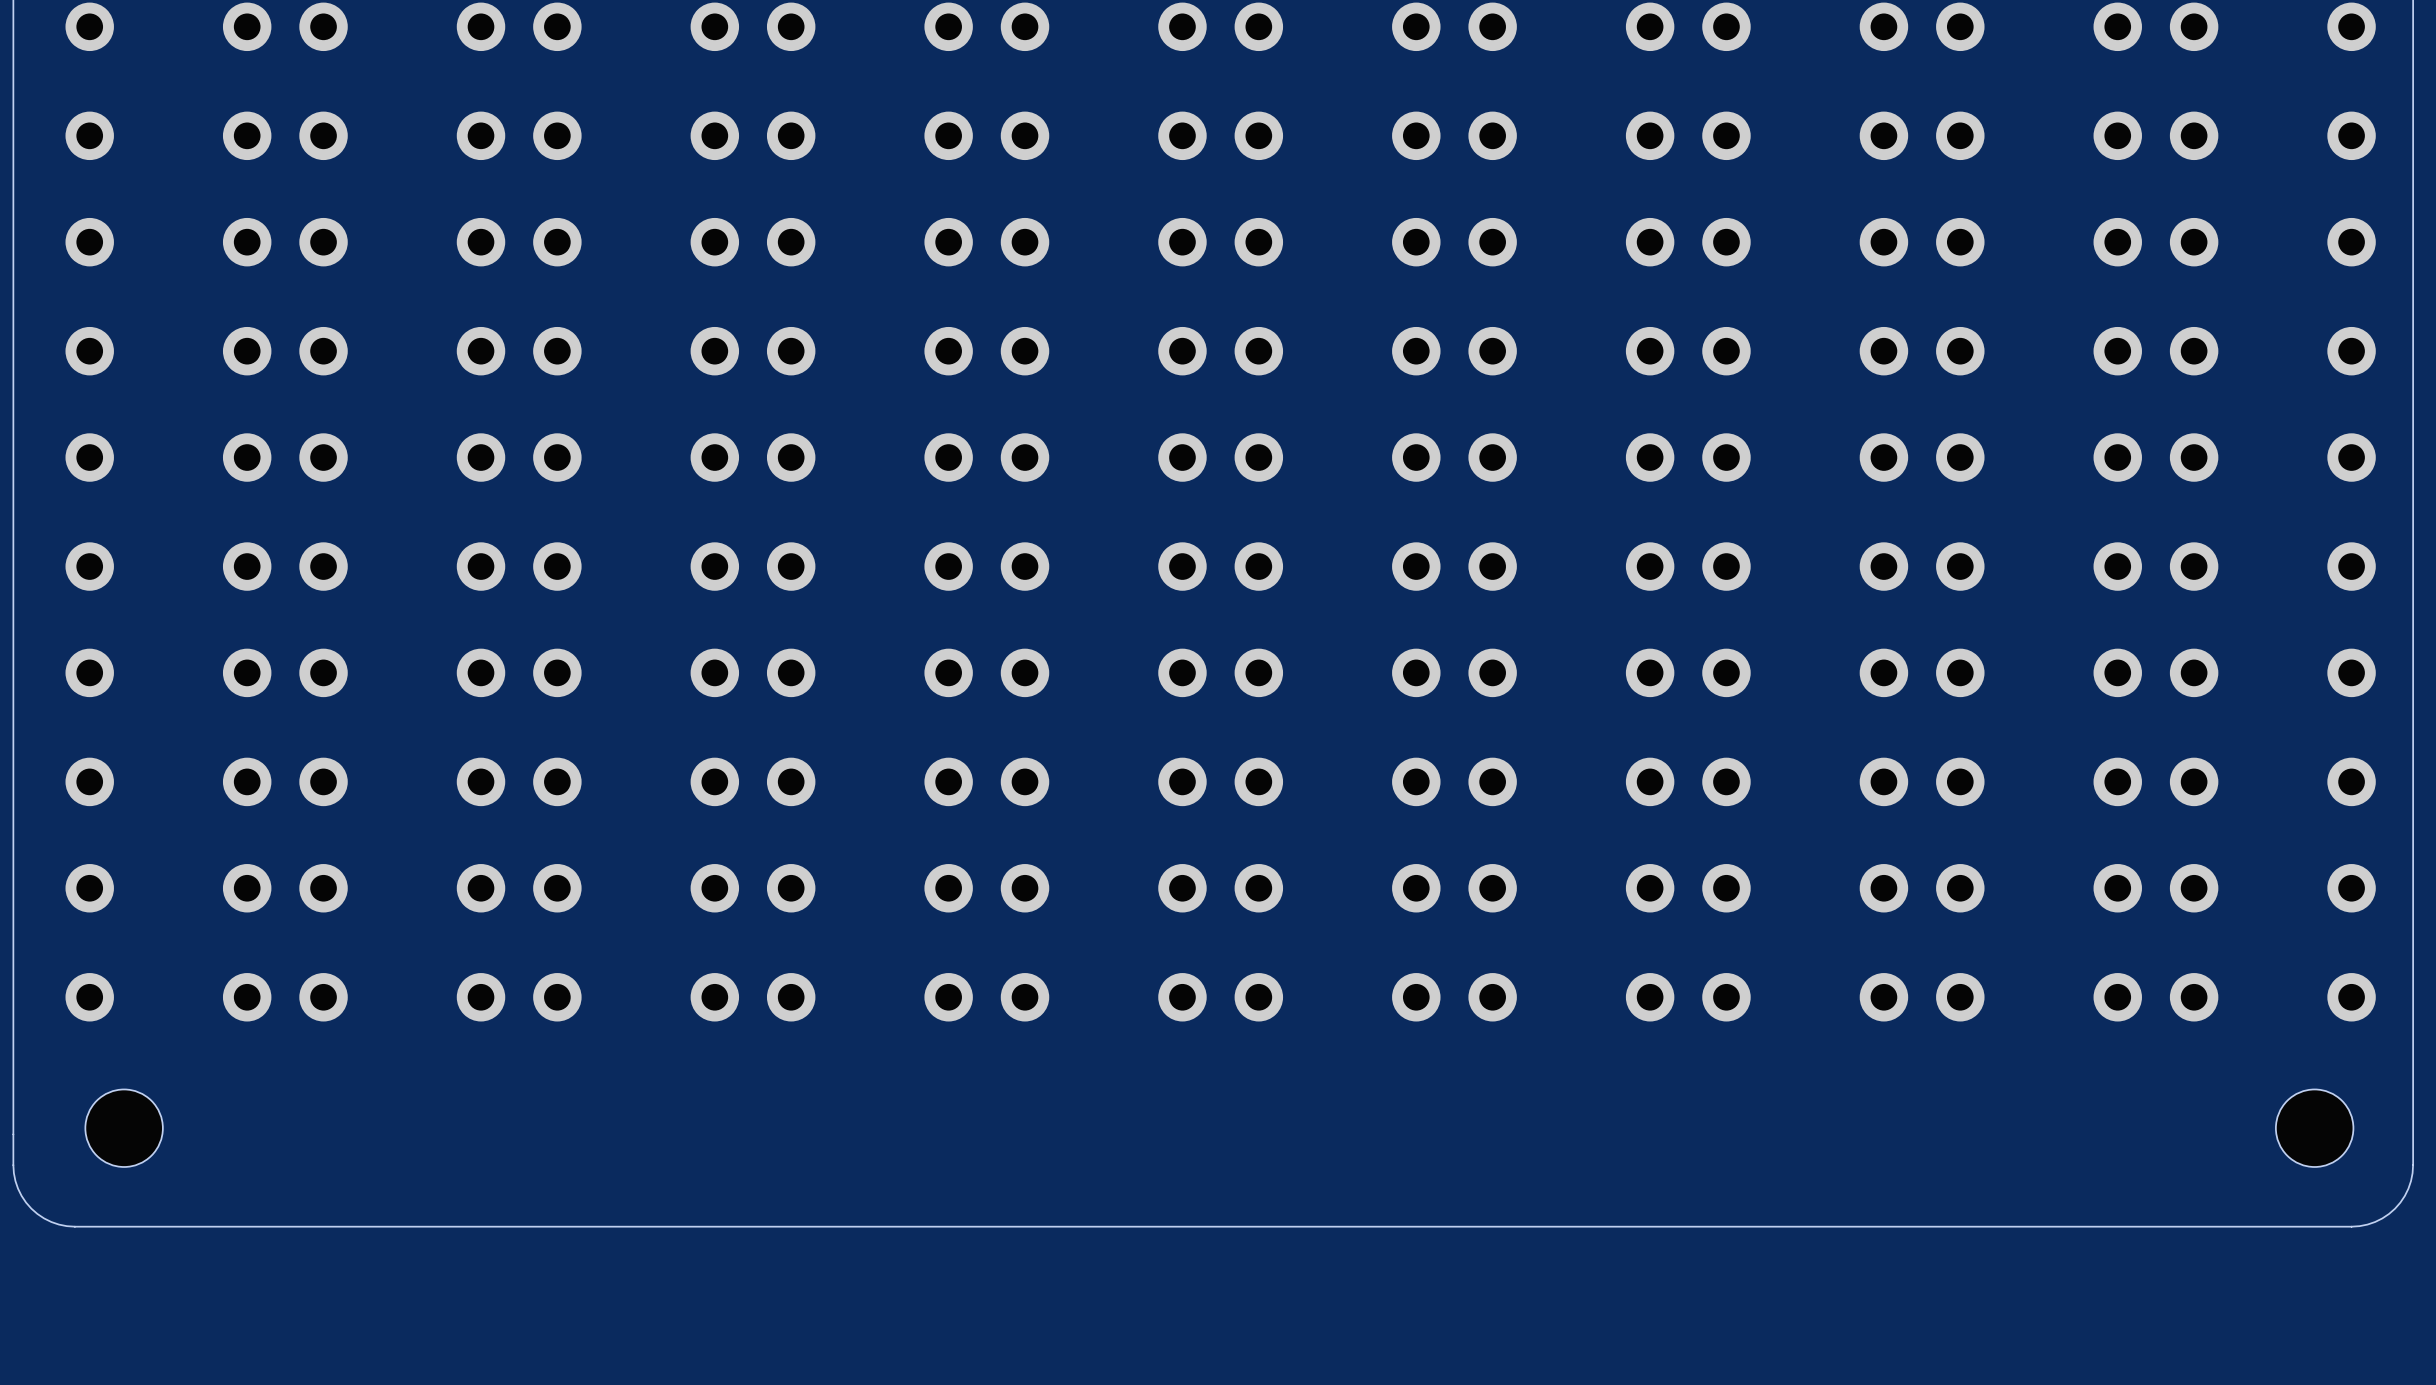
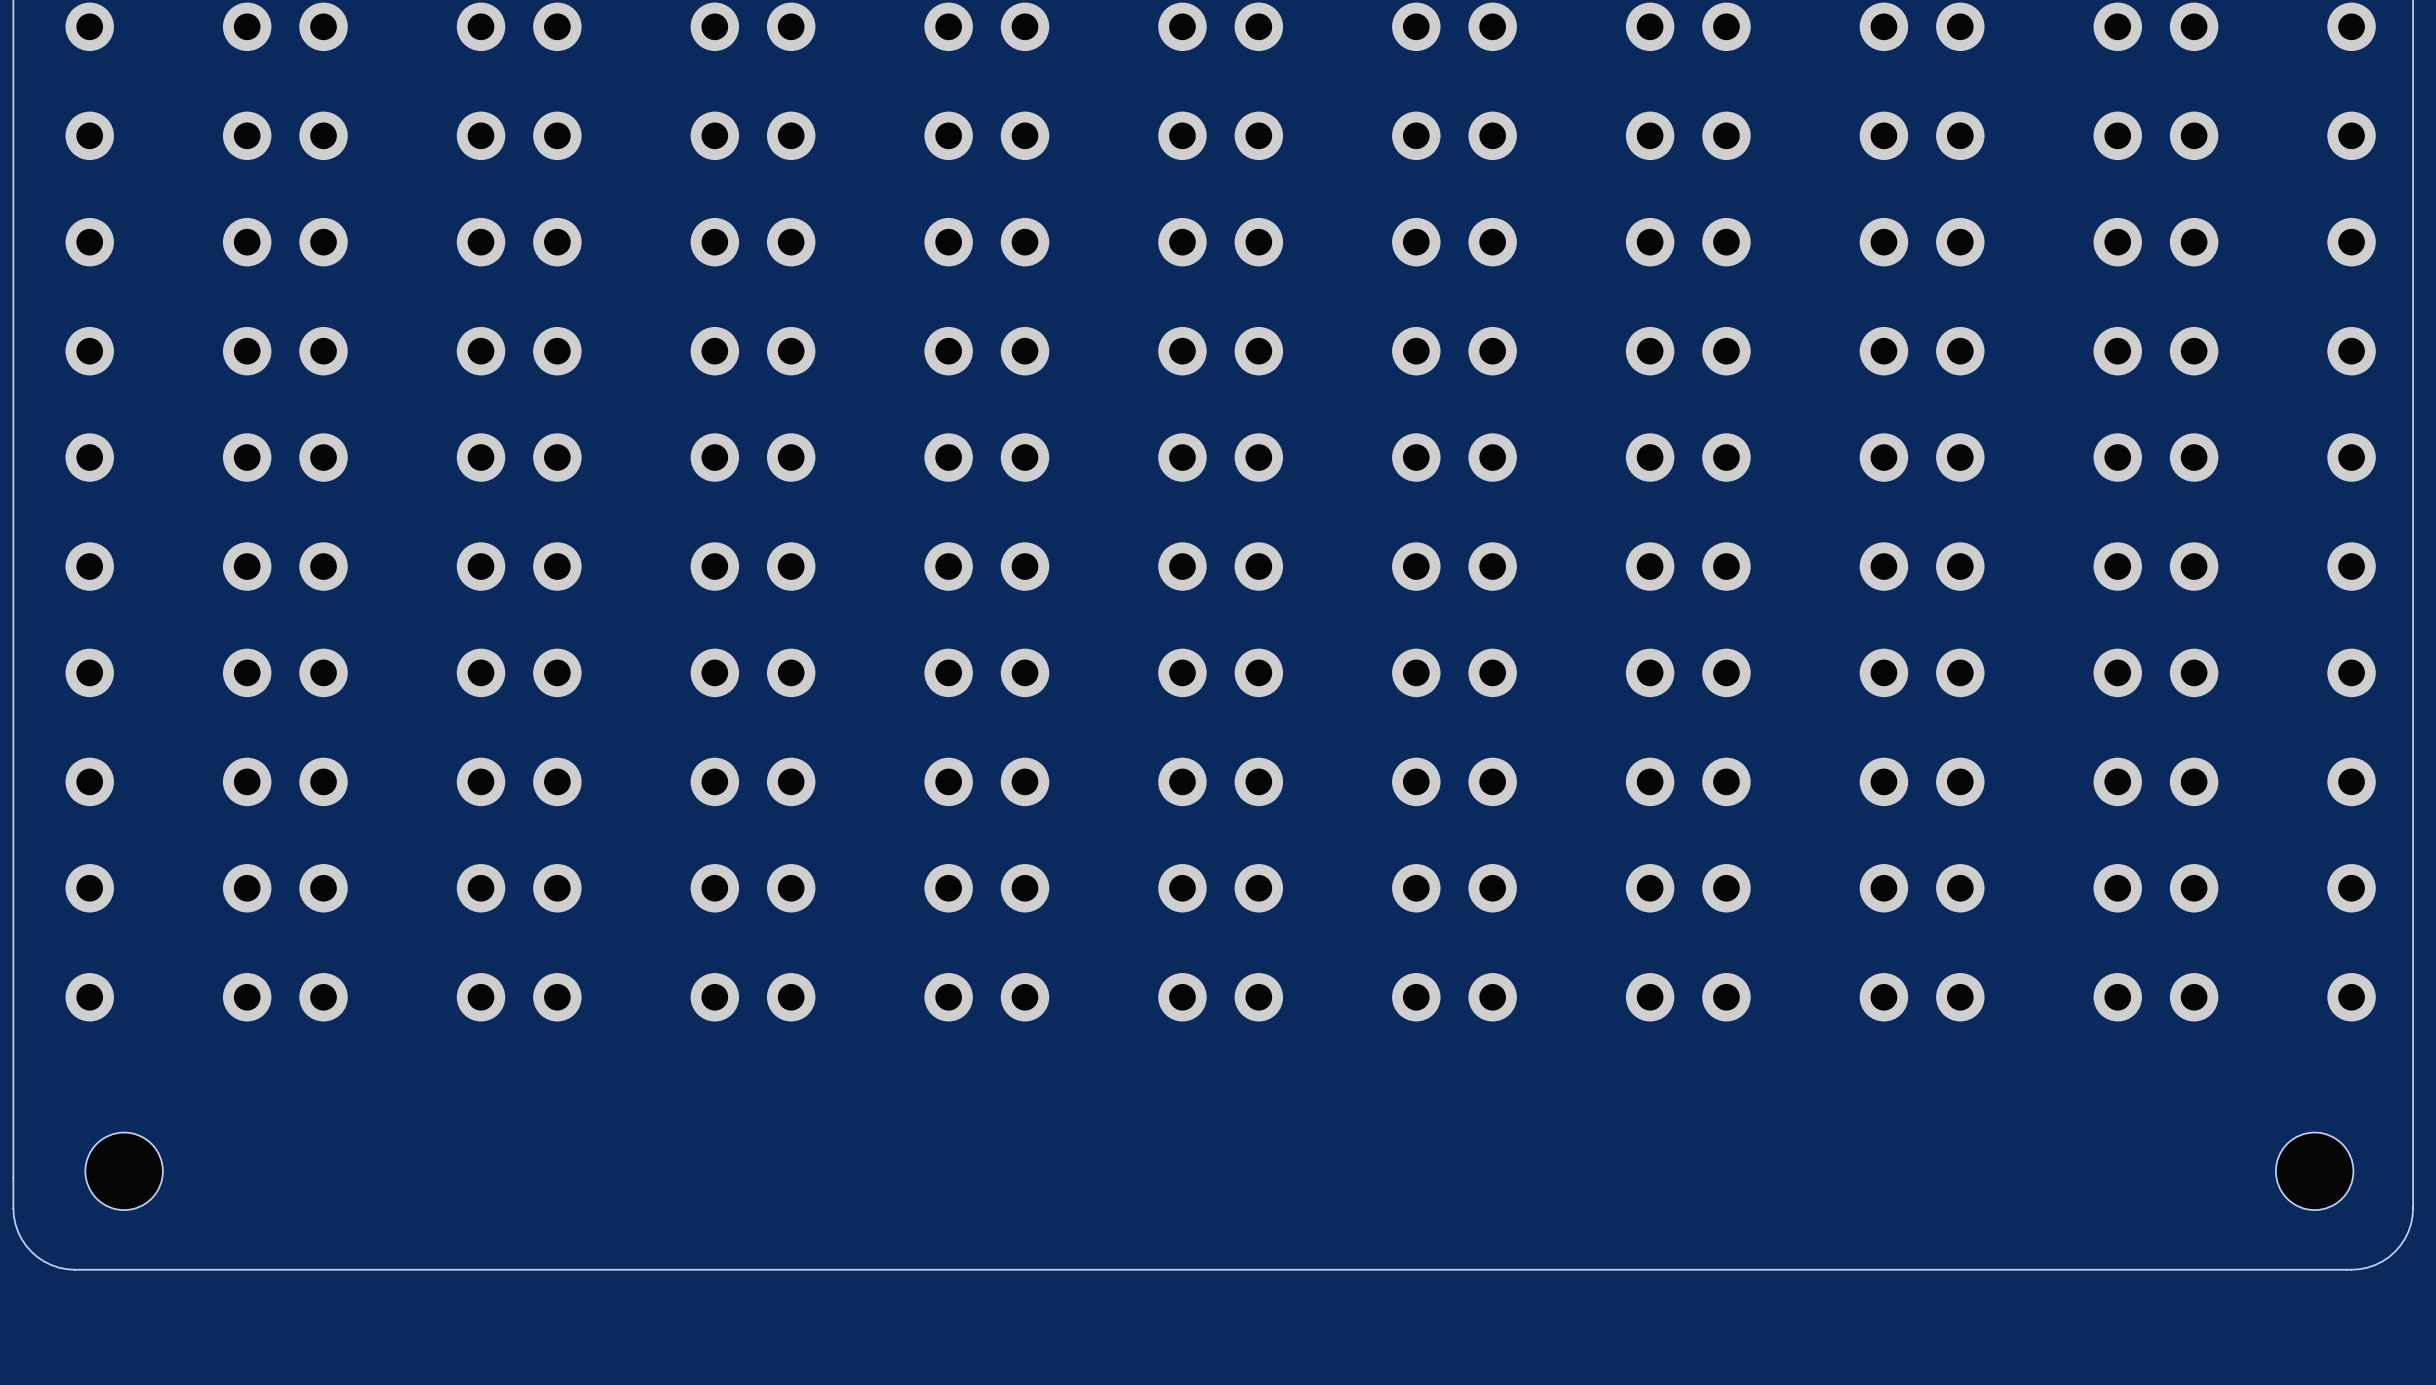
part position: (124, 1128) -> (124, 1171)
part position: (2314, 1128) -> (2314, 1171)
board edge: (2413, 1165) (2408, 1188) (2395, 1208) (2375, 1222) (2351, 1226) (74, 1226) (51, 1222) (31, 1208) (18, 1188) (13, 1165) -> (2413, 1165) (2412, 1216) (2404, 1238) (2395, 1251) (2382, 1261) (2367, 1267) (2351, 1269) (74, 1269) (58, 1267) (44, 1261) (31, 1251) (21, 1238) (13, 1216) (13, 1165)

